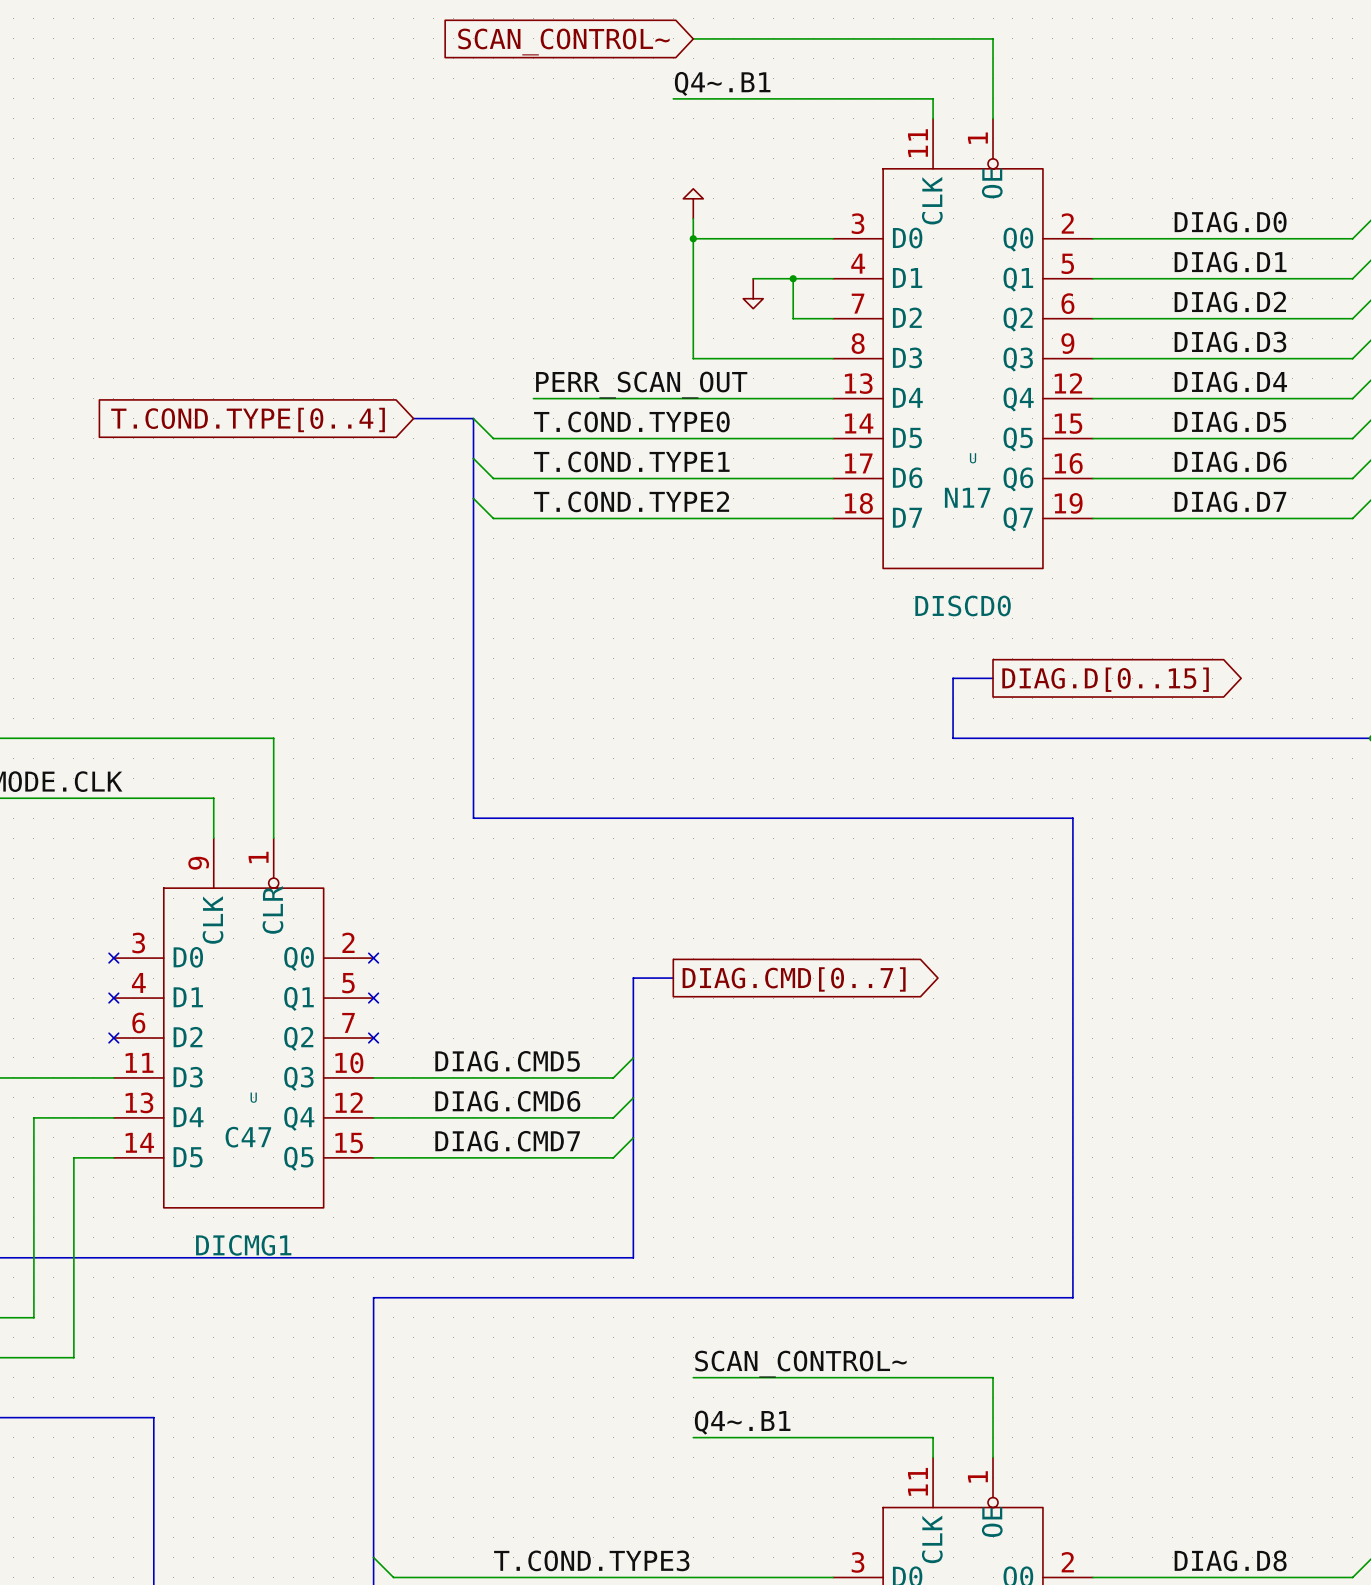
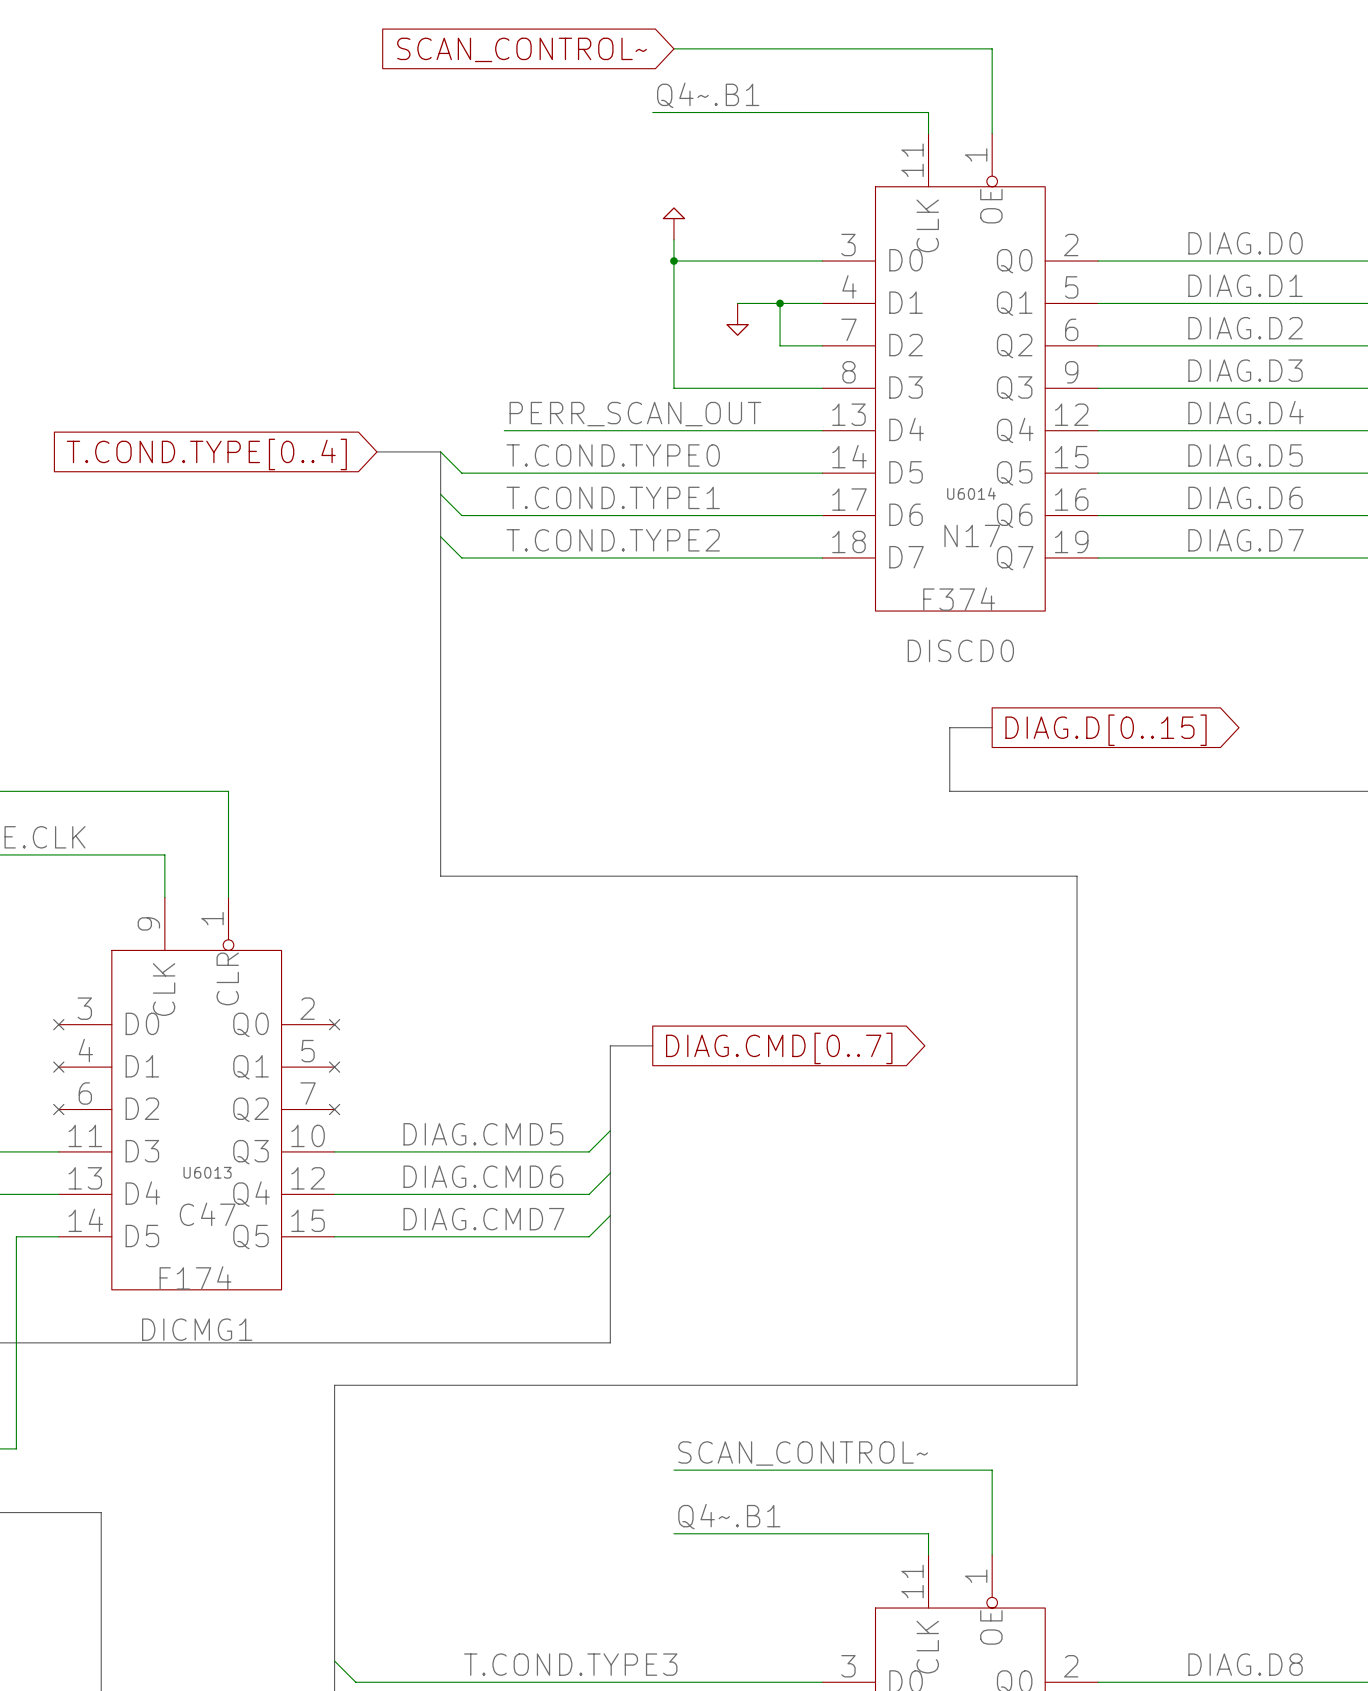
U name: U (973, 458) -> U6014 (971, 493)
U value: none -> F374 (959, 599)
U name: U (253, 1097) -> U6013 (207, 1172)
U value: none -> F174 (195, 1277)

